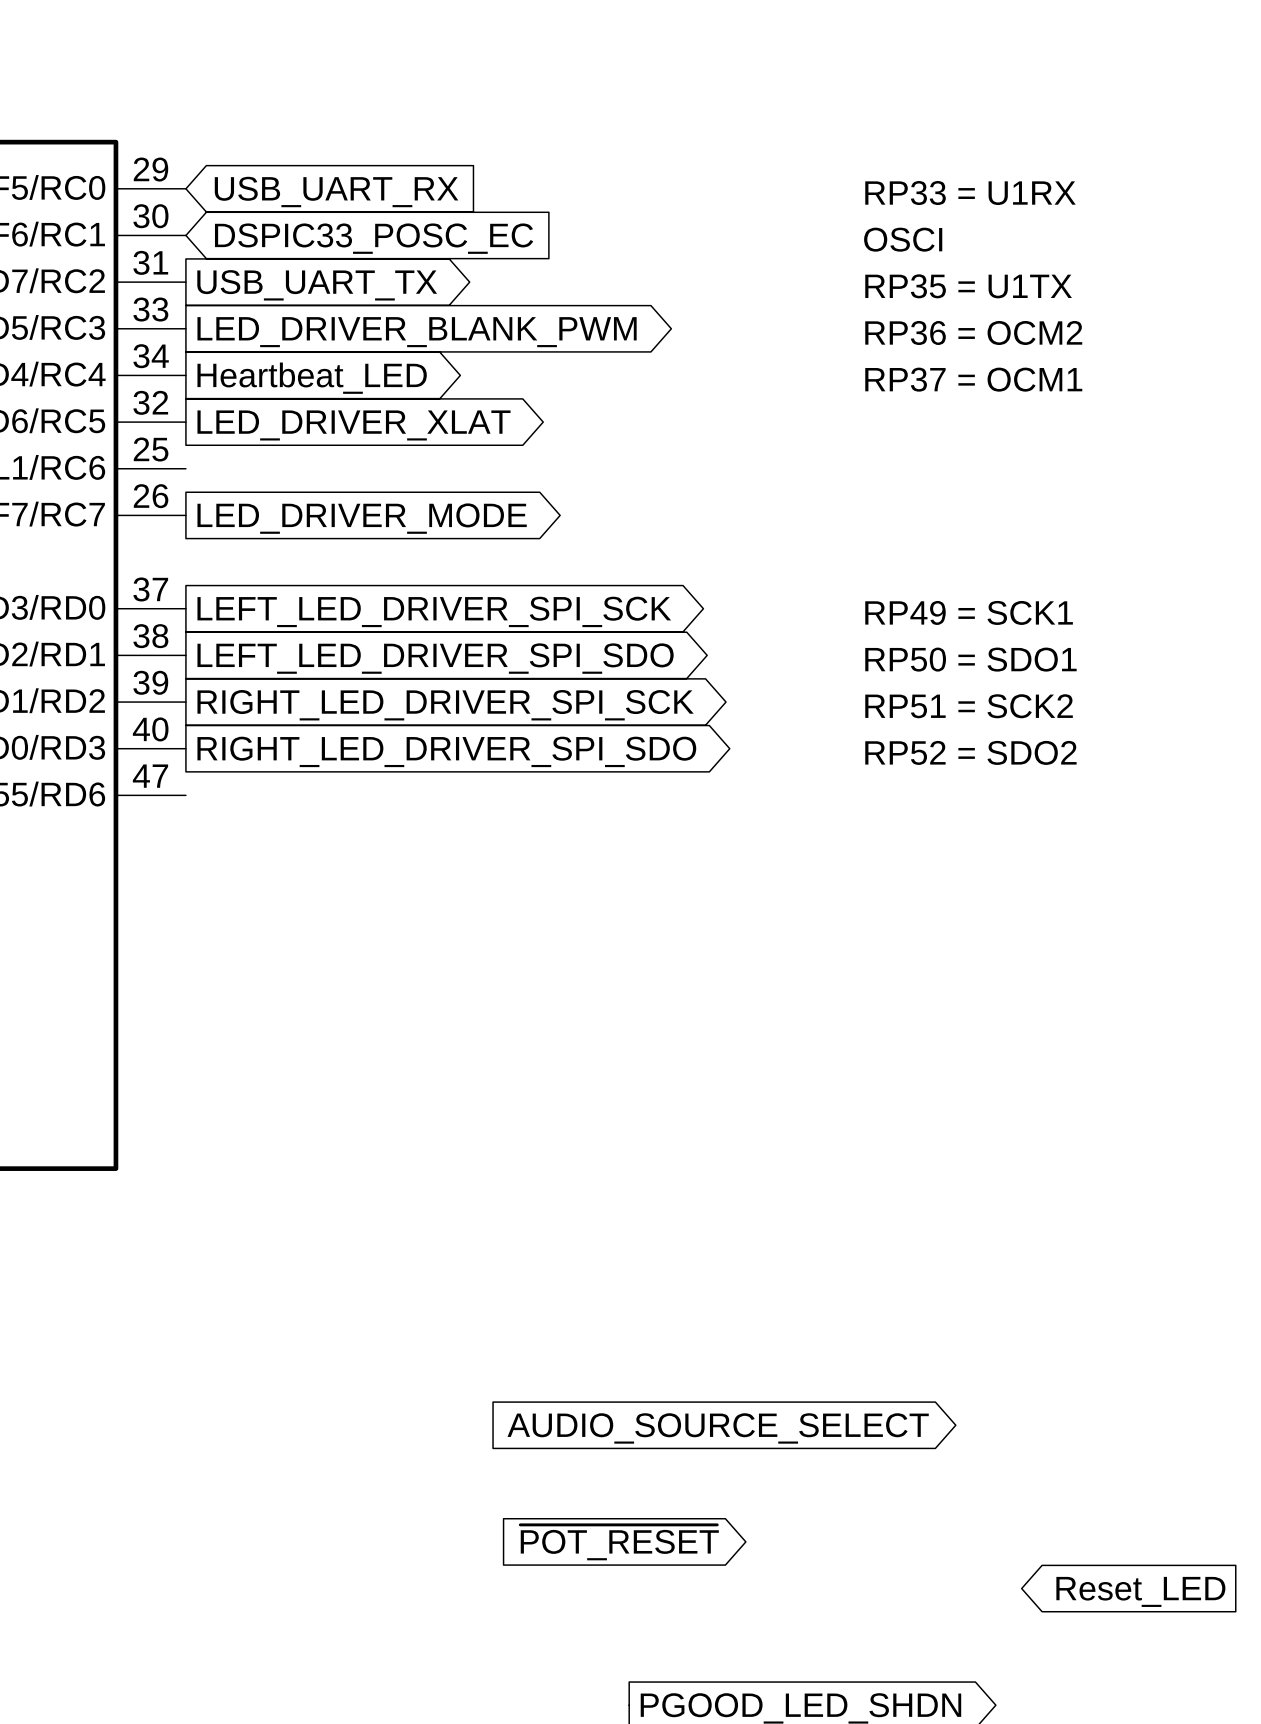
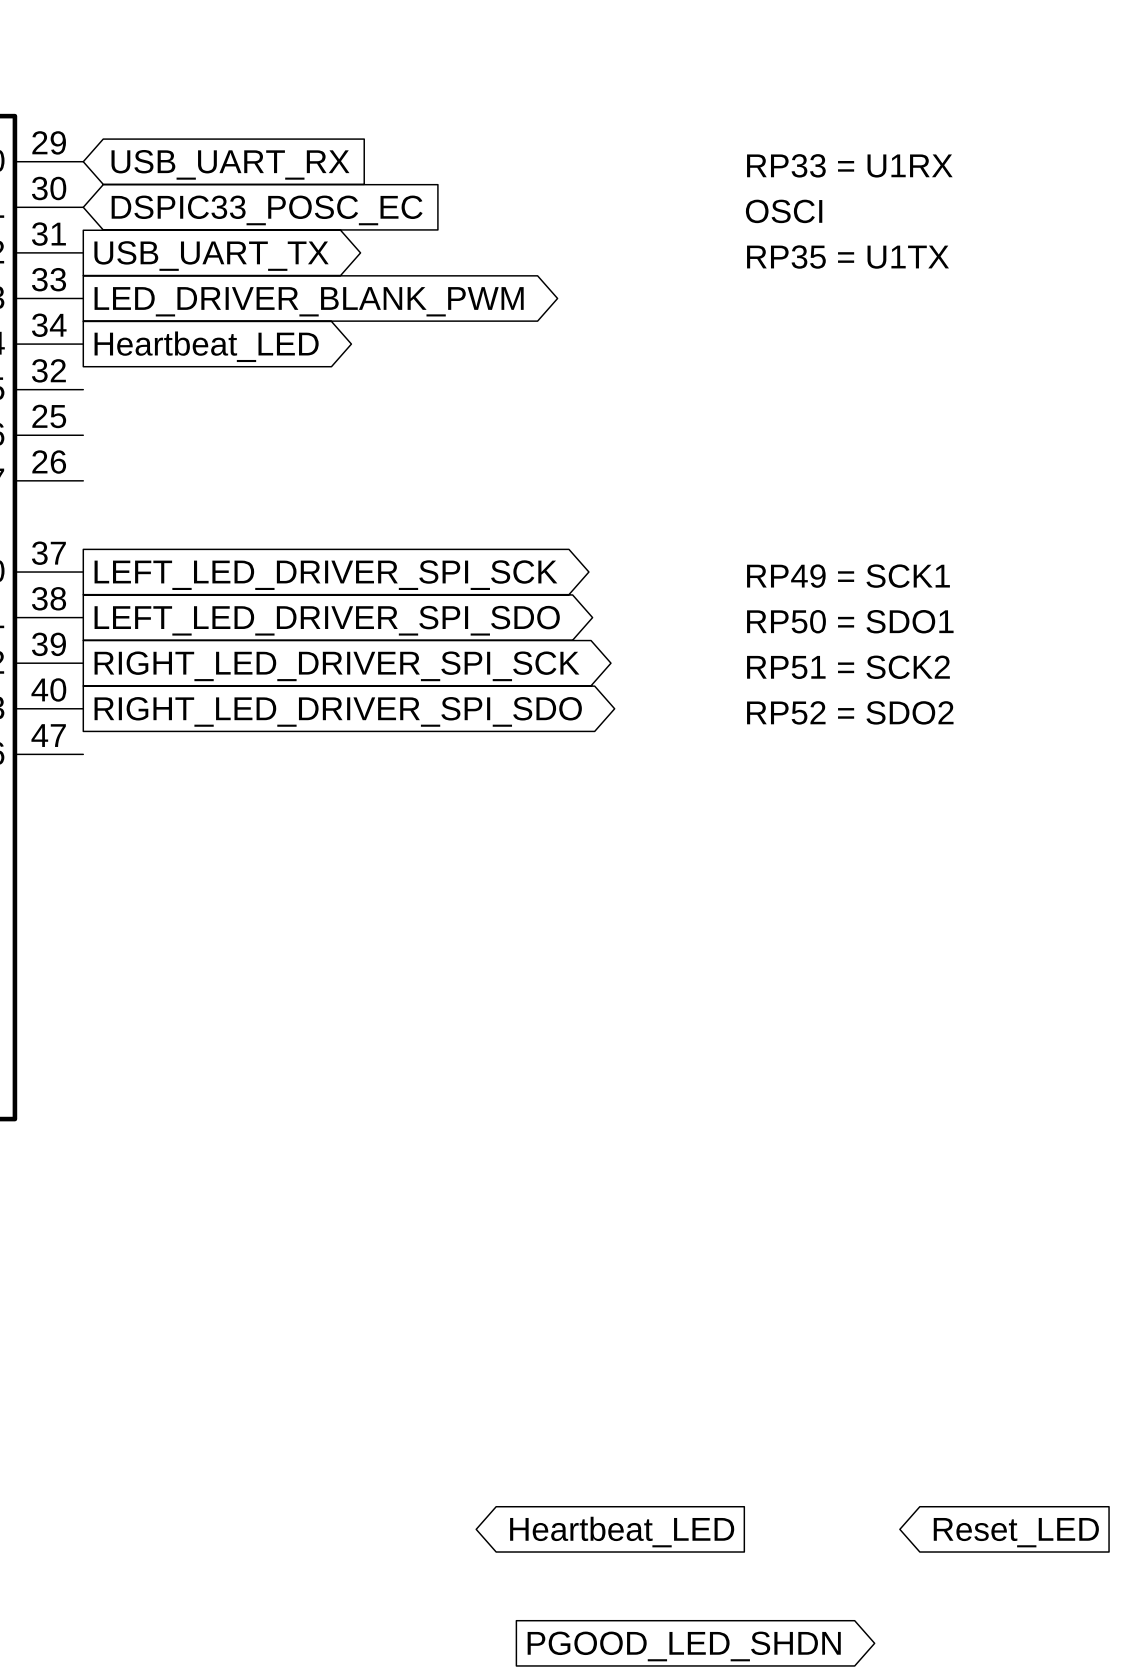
text: RP36 = OCM2 (973, 332) -> none
text: RP37 = OCM1 (973, 379) -> none
global label: LED_DRIVER_XLAT (354, 425) -> none
global label: LED_DRIVER_MODE (362, 518) -> none
global label: AUDIO_SOURCE_SELECT (718, 1428) -> none
global label: ~{POT_RESET} (619, 1542) -> none
global label: none -> Heartbeat_LED (622, 1532)

